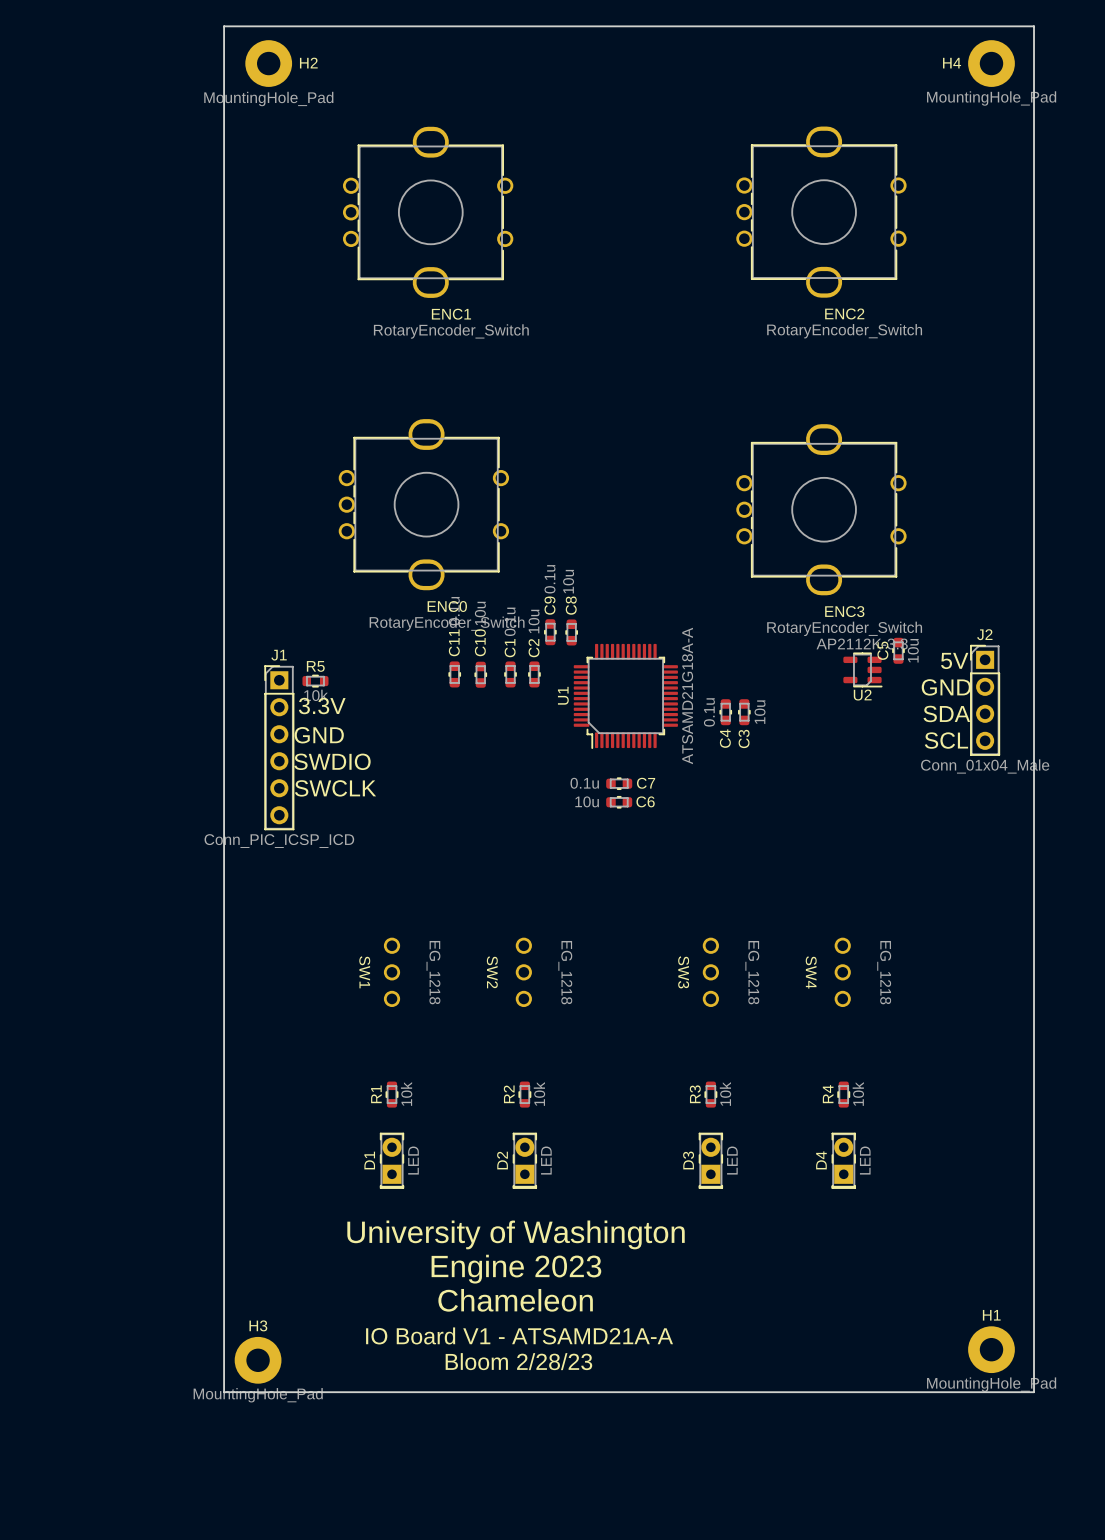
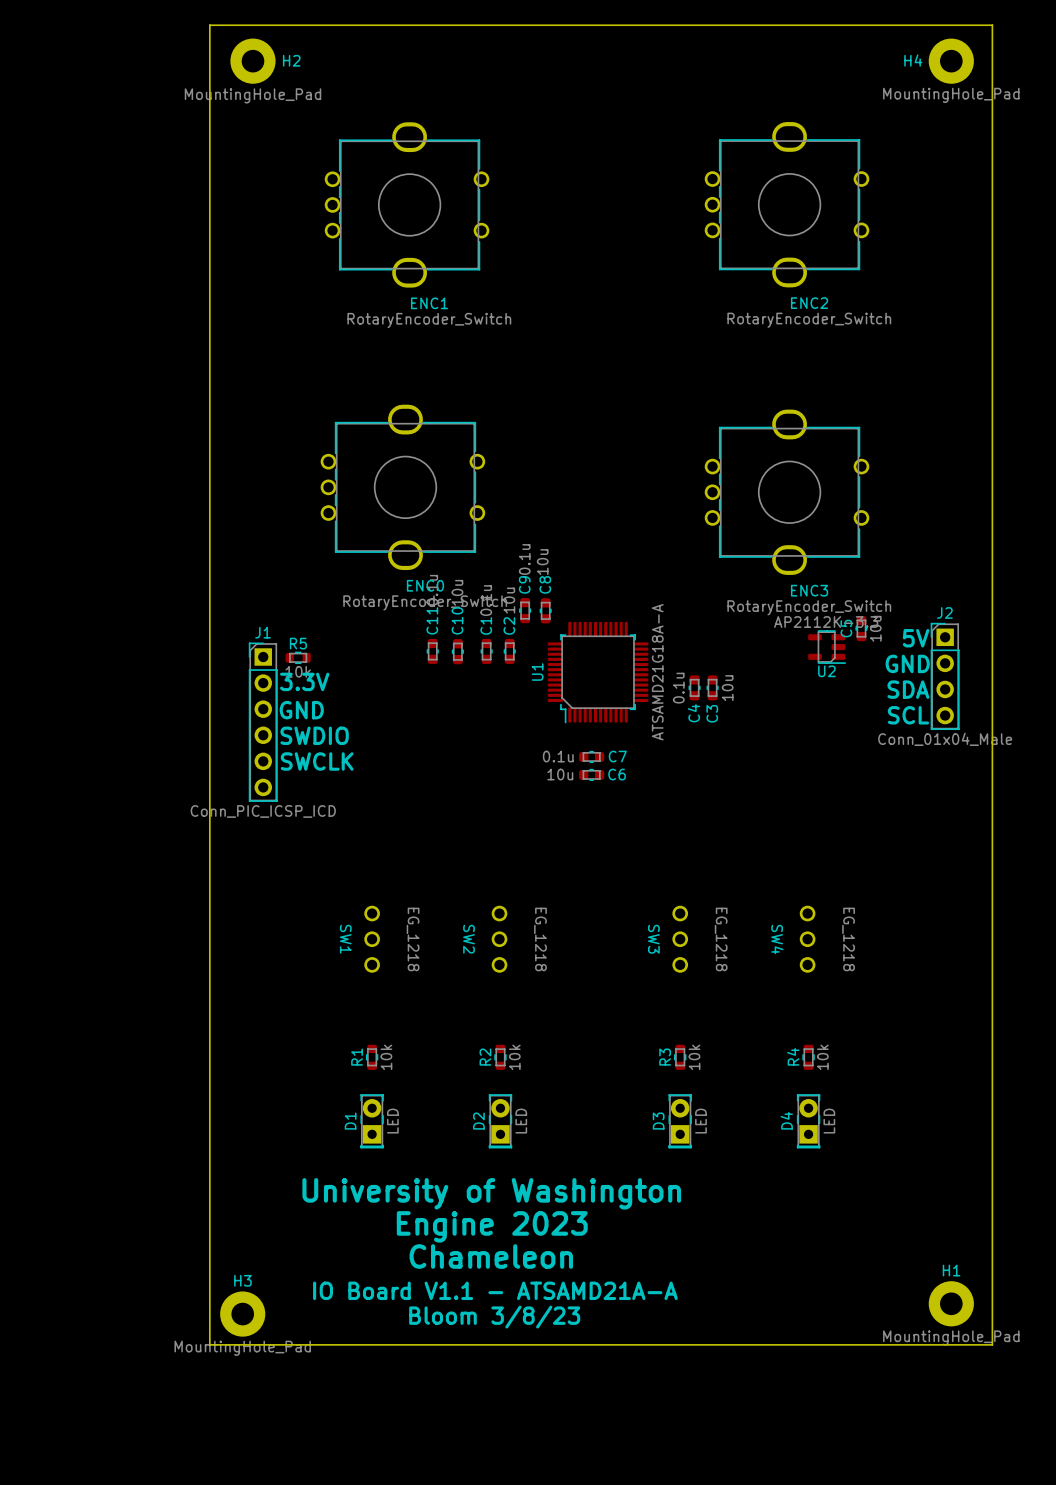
text: IO Board V1 - ATSAMD21A-A (519, 1335) -> IO Board V1.1 - ATSAMD21A-A (495, 1290)
text: Bloom 2/28/23 (518, 1361) -> Bloom 3/8/23 (494, 1317)

